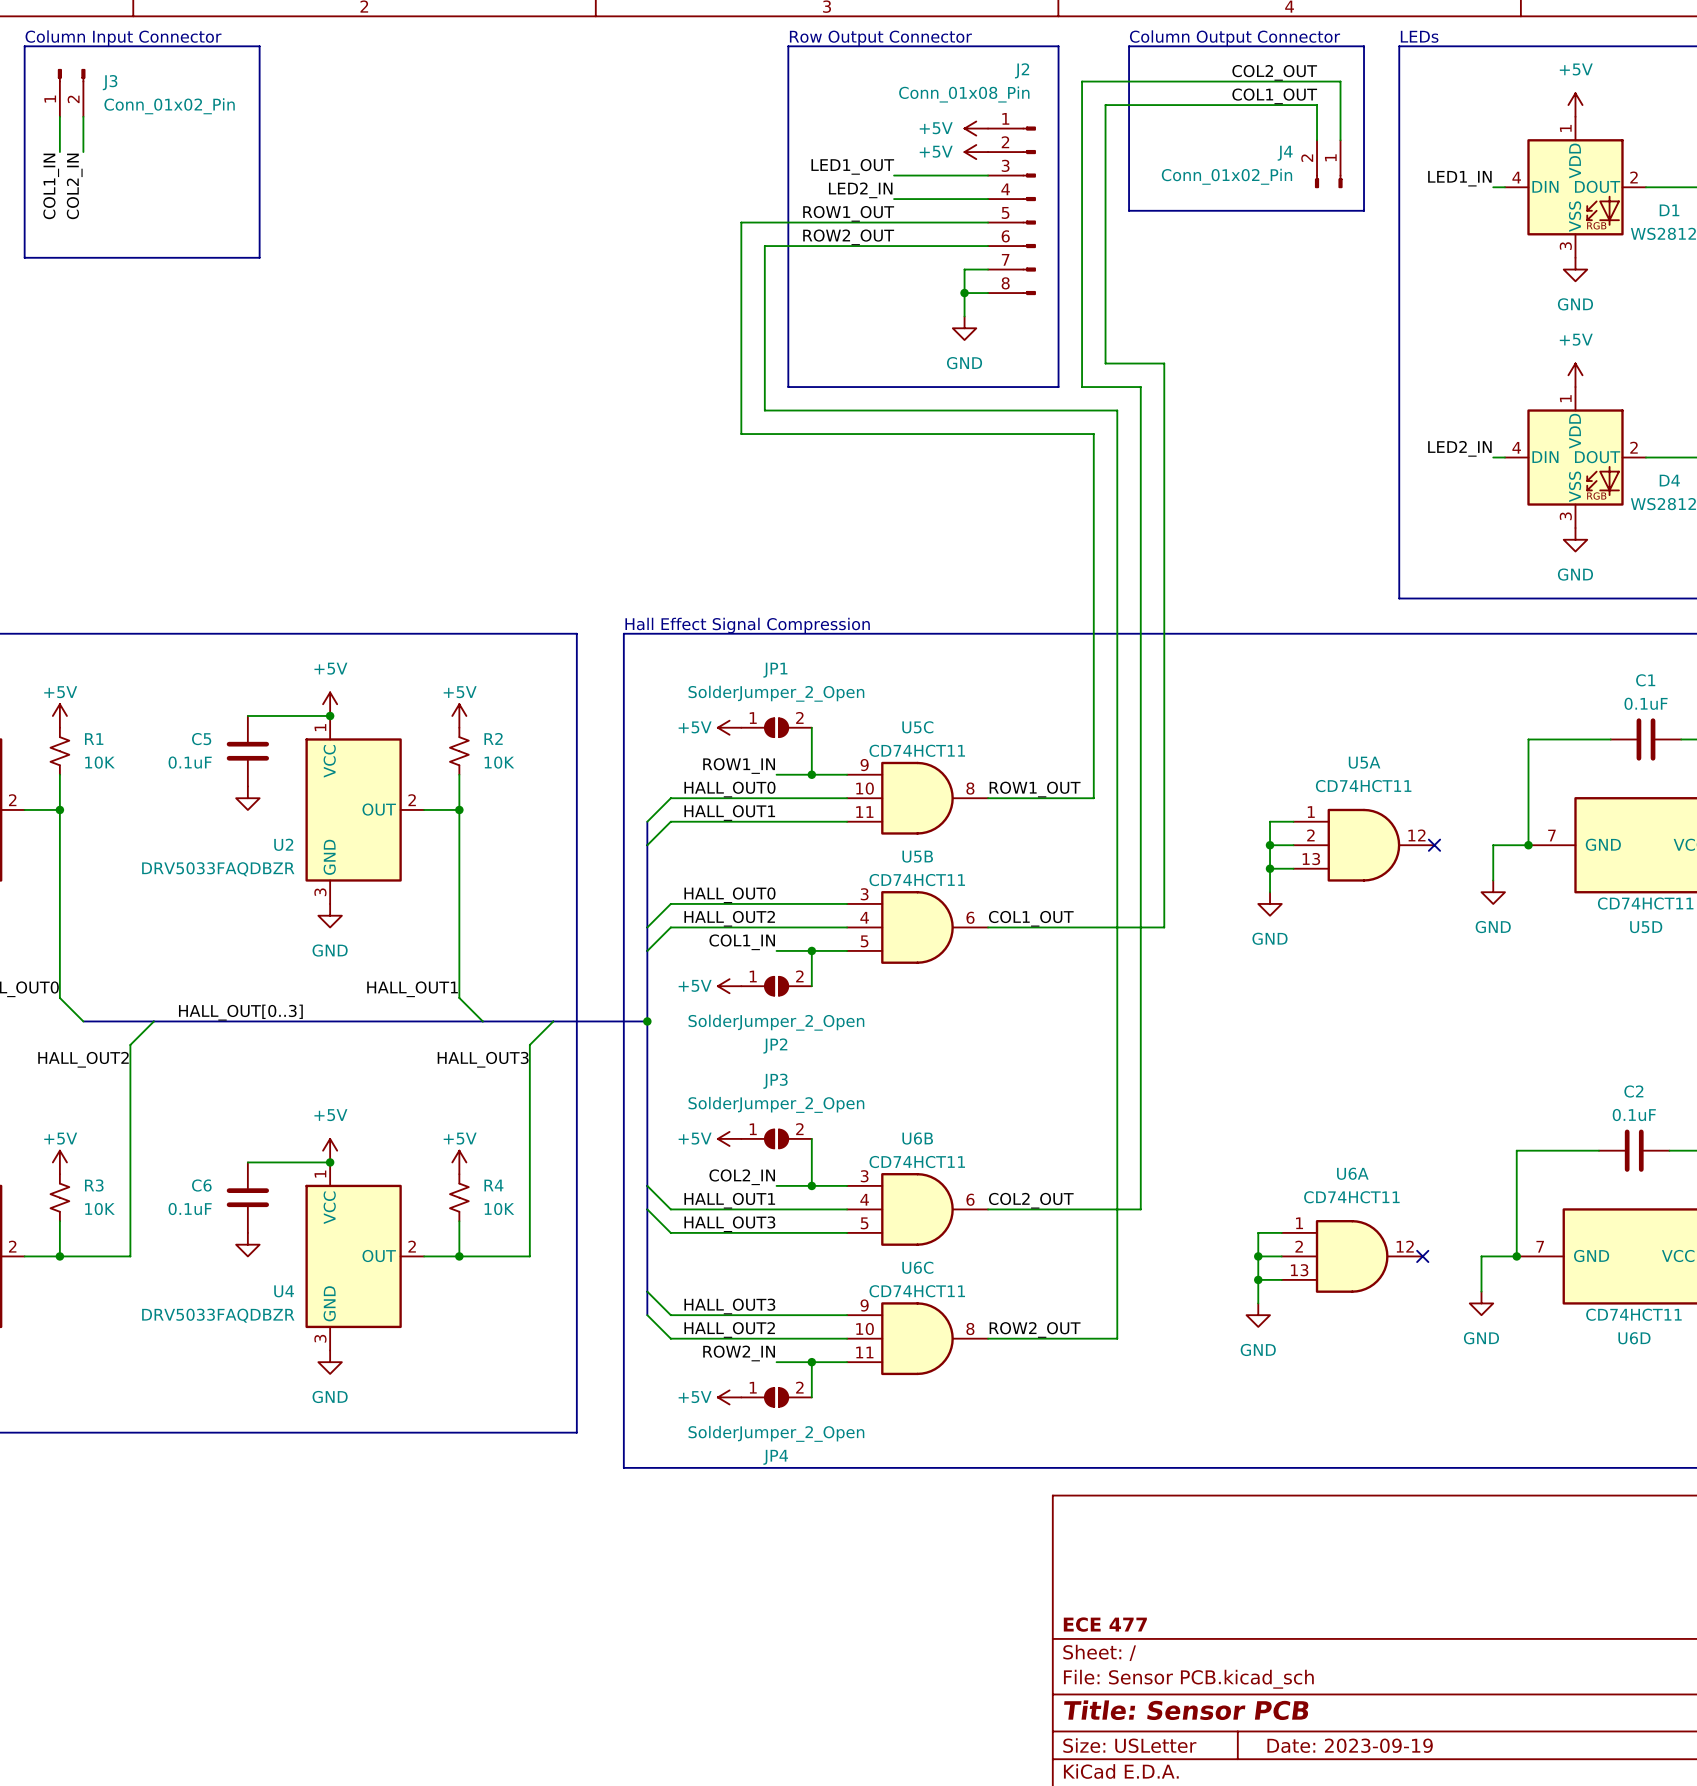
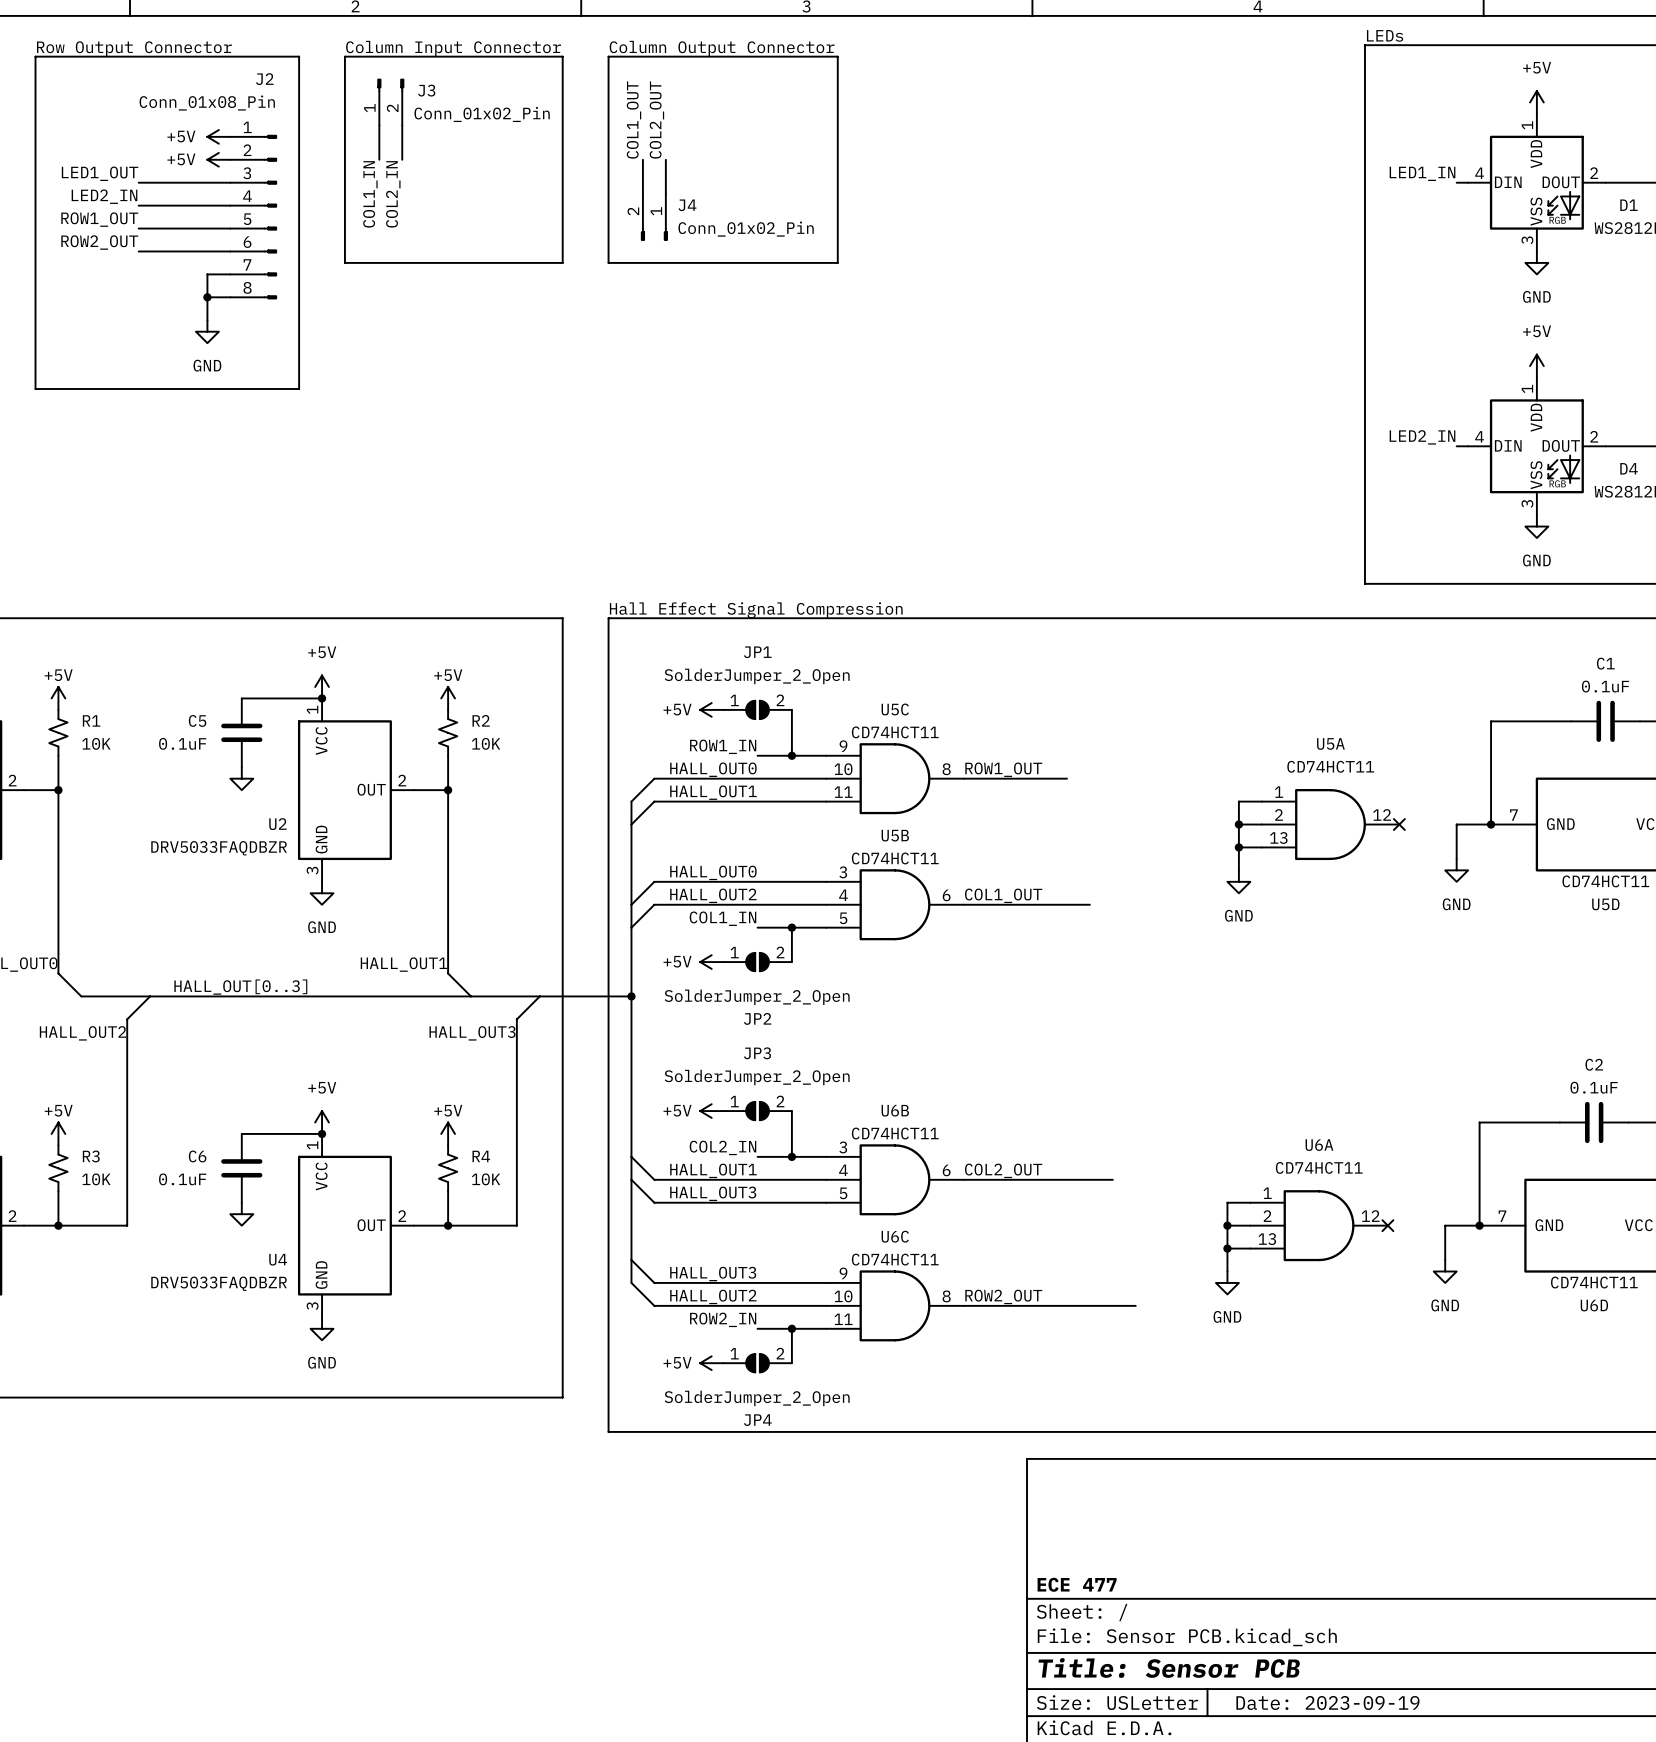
text: Column Input Connector (123, 38) -> Row Output Connector (134, 48)
text: Row Output Connector (880, 38) -> Column Output Connector (722, 48)
text: Column Output Connector (1235, 38) -> none
line: (24, 46) (259, 46) (259, 257) (24, 257) (24, 46) -> none
line: (788, 46) (1058, 46) (1058, 387) (788, 387) (788, 46) -> none
line: (1129, 46) (1364, 46) (1364, 210) (1129, 210) (1129, 46) -> none
text: none -> Column Input Connector (453, 48)
line: none -> (35, 56) (299, 56) (299, 389) (35, 389) (35, 56)
line: none -> (344, 56) (562, 56) (562, 262) (344, 262) (344, 56)
line: none -> (608, 56) (837, 56) (837, 262) (608, 262) (608, 56)
label: COL2_OUT (1274, 72) -> none
J3 position: (71, 92) -> (390, 102)
label: COL1_OUT (1274, 96) -> none
wire: (59, 116) (59, 152) -> none
wire: (83, 116) (83, 152) -> none
label: none -> COL1_OUT (634, 120)
label: none -> COL2_OUT (656, 120)
wire: none -> (379, 125) (379, 159)
wire: none -> (402, 125) (402, 159)
power symbol: +5V (976, 128) -> none
power symbol: none -> +5V (218, 136)
wire: (1317, 140) (1317, 105) (1105, 105) (1105, 363) (1164, 363) (1164, 927) (1117, 927) -> none
wire: (1340, 140) (1340, 81) (1082, 81) (1082, 387) (1140, 387) (1140, 1209) -> none
power symbol: +5V (976, 152) -> none
J4 name position: J4 (1285, 153) -> J4 (687, 205)
power symbol: none -> +5V (218, 159)
wire: none -> (642, 159) (642, 194)
wire: none -> (665, 159) (665, 194)
J4 position: (1328, 164) -> (654, 217)
label: LED1_OUT (852, 166) -> none
wire: (894, 175) (988, 175) -> none
J4 value position: Conn_01x02_Pin (1226, 176) -> Conn_01x02_Pin (746, 229)
label: none -> LED1_OUT (100, 173)
label: COL1_IN (51, 186) -> none
label: COL2_IN (74, 186) -> LED2_IN (104, 196)
wire: none -> (138, 182) (230, 182)
label: LED2_IN (860, 190) -> none
label: none -> COL1_IN (370, 194)
label: none -> COL2_IN (393, 194)
wire: (894, 199) (988, 199) -> none
wire: none -> (138, 205) (230, 205)
J2 position: (1011, 210) -> (253, 217)
label: ROW1_OUT (848, 213) -> none
wire: (988, 222) (741, 222) (741, 434) (1093, 434) (1093, 798) -> none
label: none -> ROW1_OUT (99, 219)
wire: none -> (138, 228) (230, 228)
label: ROW2_OUT (848, 237) -> none
wire: (988, 246) (764, 246) (764, 410) (1117, 410) (1117, 1338) -> (1135, 1305) (1089, 1305)
label: none -> ROW2_OUT (99, 242)
wire: (988, 269) (964, 269) (964, 316) -> none
wire: none -> (230, 274) (207, 274) (207, 320)
wire: (964, 293) (988, 293) -> none
junction: (964, 293) -> none
wire: none -> (207, 297) (230, 297)
junction: none -> (207, 297)
power symbol: GND (964, 328) -> none
power symbol: none -> GND (207, 331)

